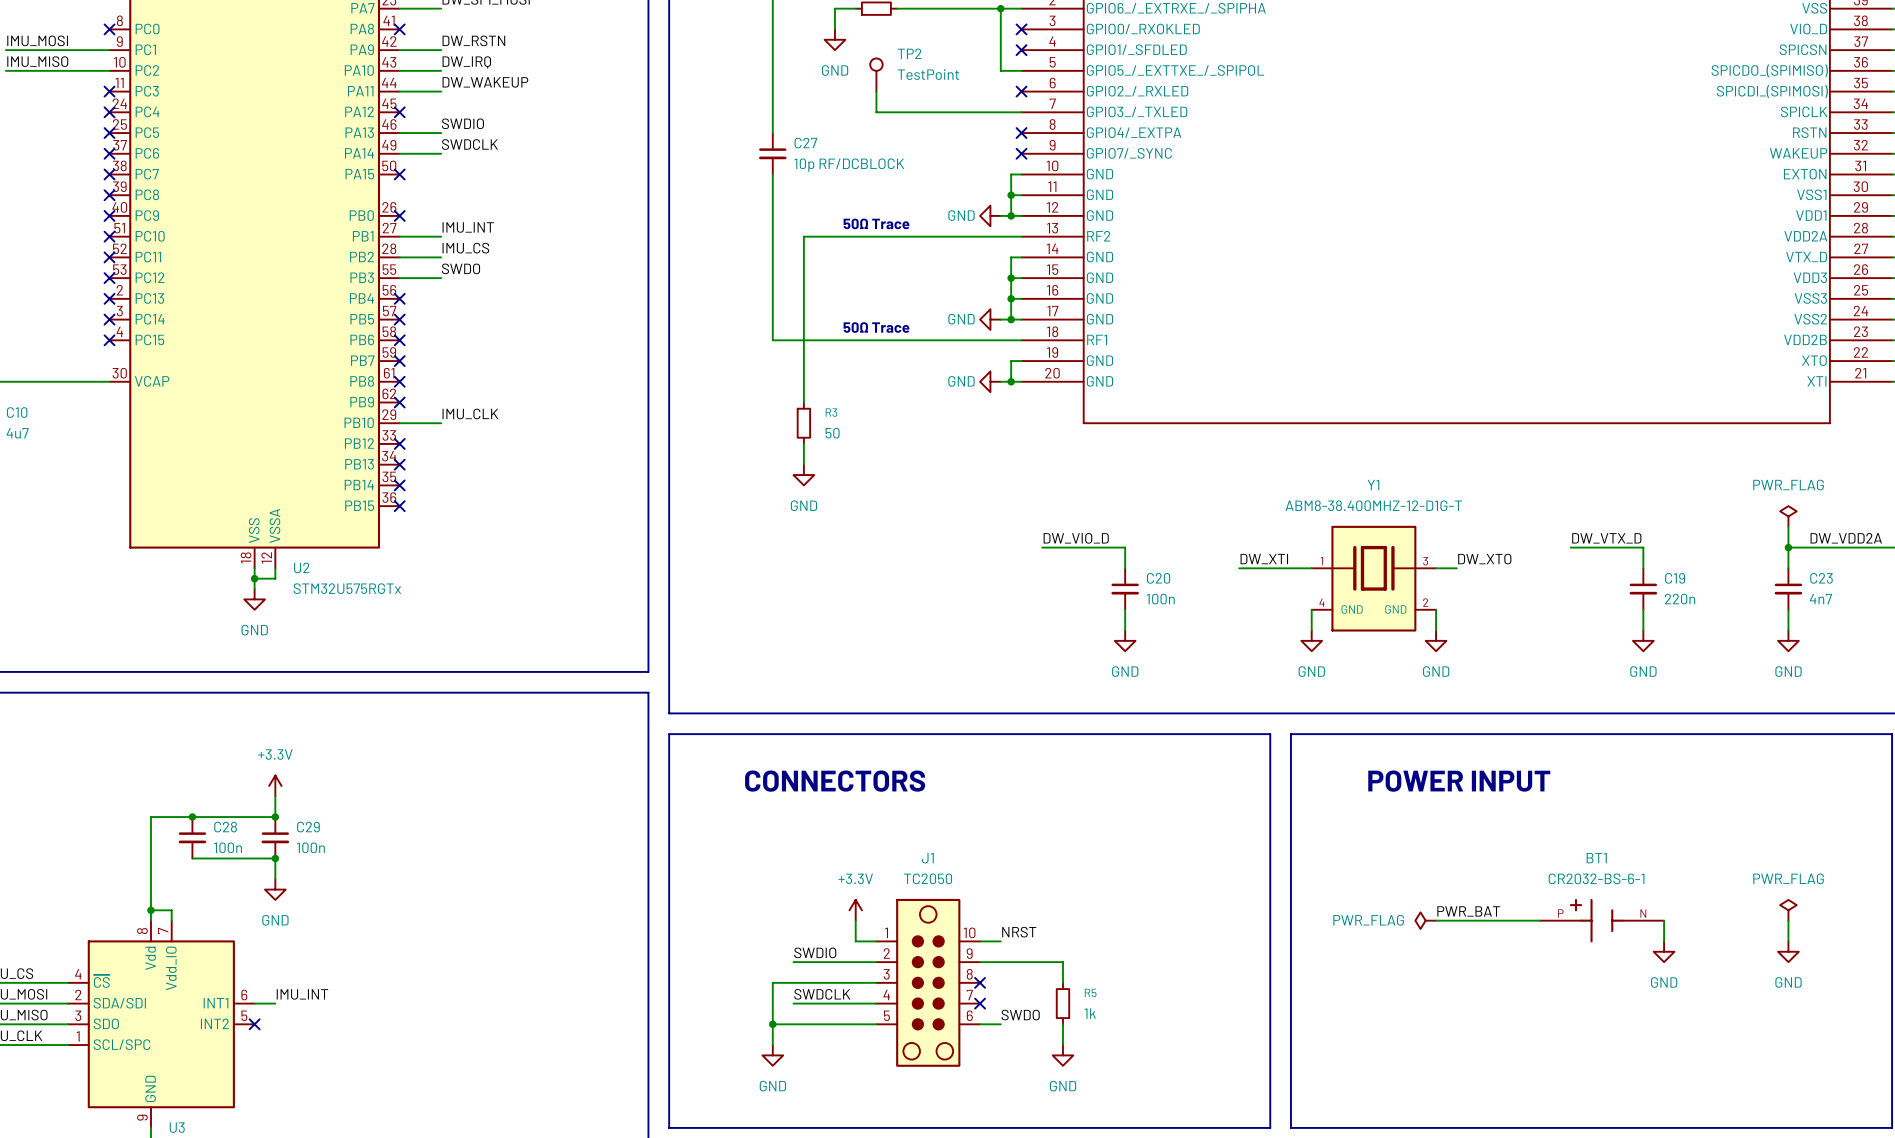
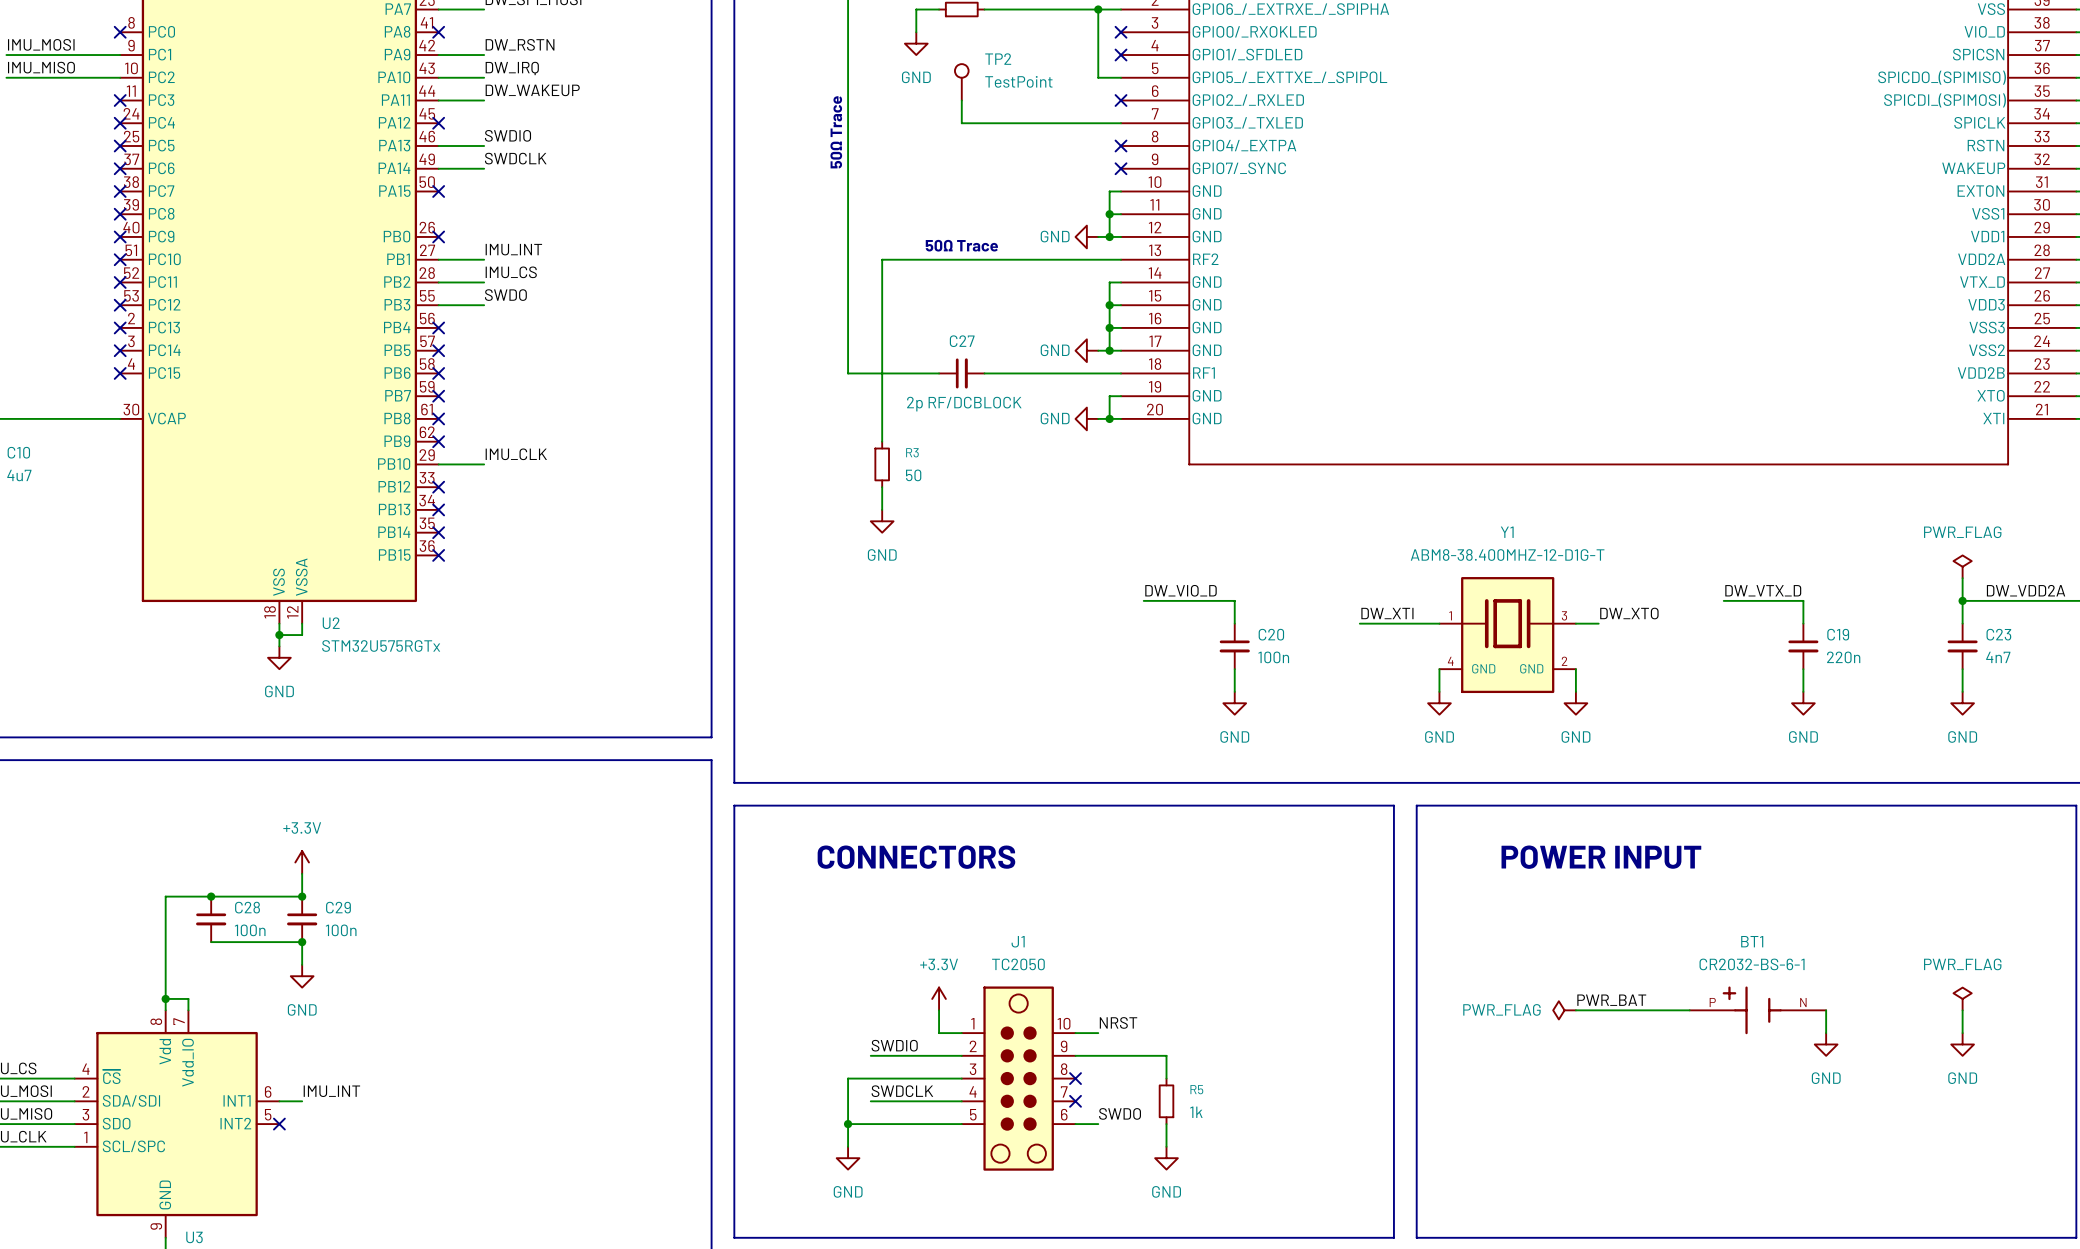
text: none -> 50Ω Trace (836, 132)
C27 rotation: 0° (772, 153) -> 90° counterclockwise (961, 373)
C27 position: (772, 153) -> (961, 373)
C27 value: 10p RF/DCBLOCK (849, 165) -> 2p RF/DCBLOCK (964, 404)
text: 50Ω Trace (876, 327) -> none

